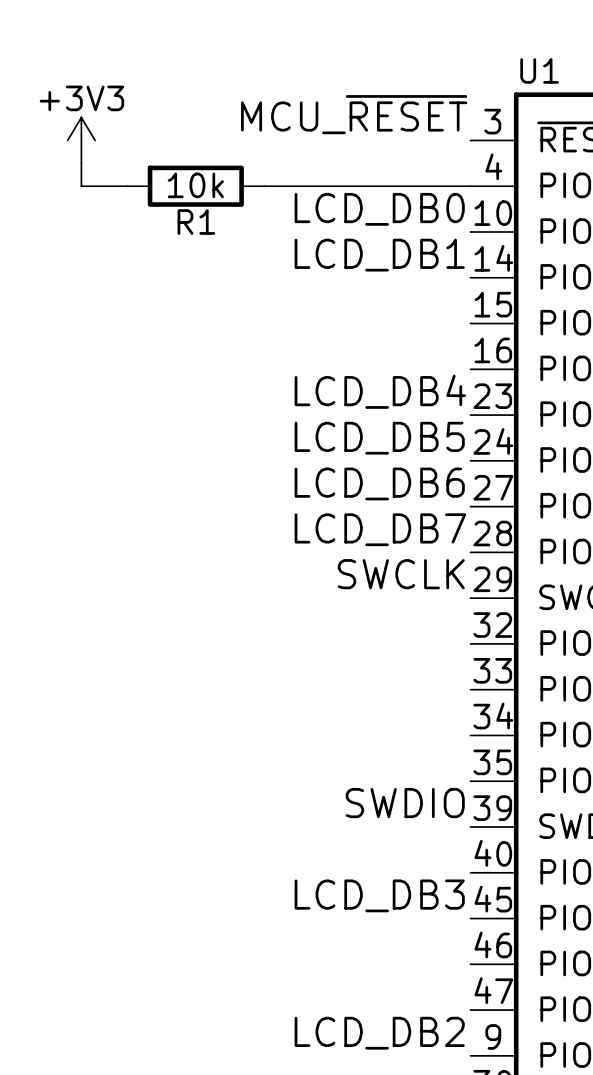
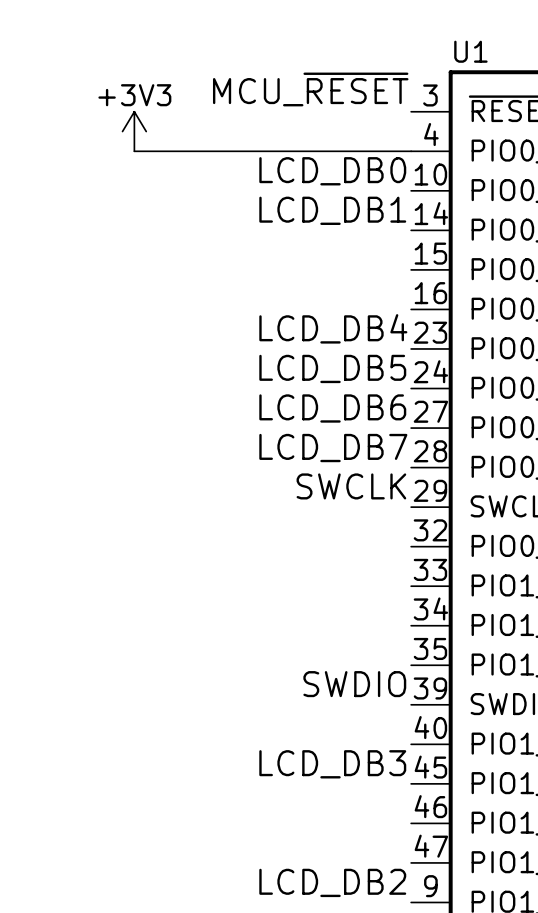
power symbol position: +3V3 (81, 140) -> +3V3 (134, 131)
wire: (81, 163) (81, 186) (127, 186) -> none
wire: none -> (134, 151) (233, 151)
R1: 10k (195, 186) -> none

